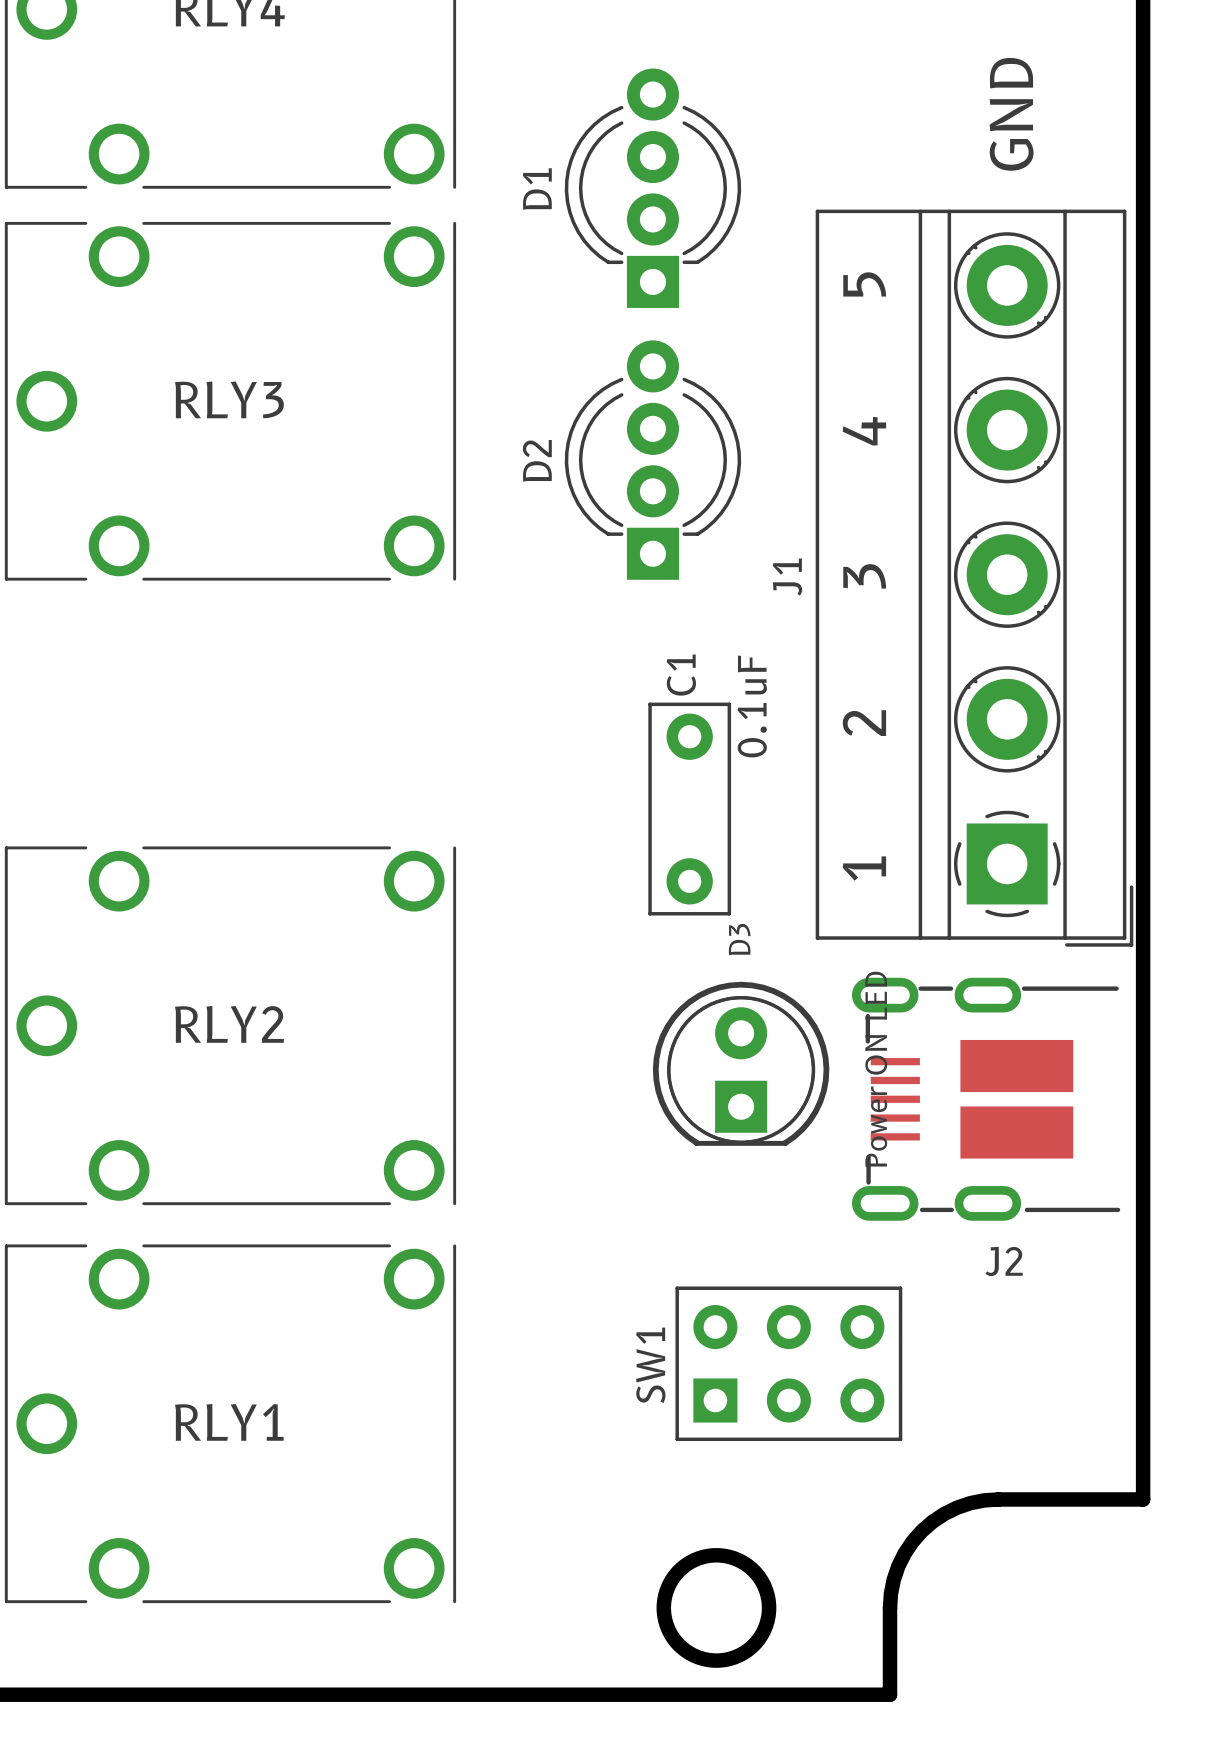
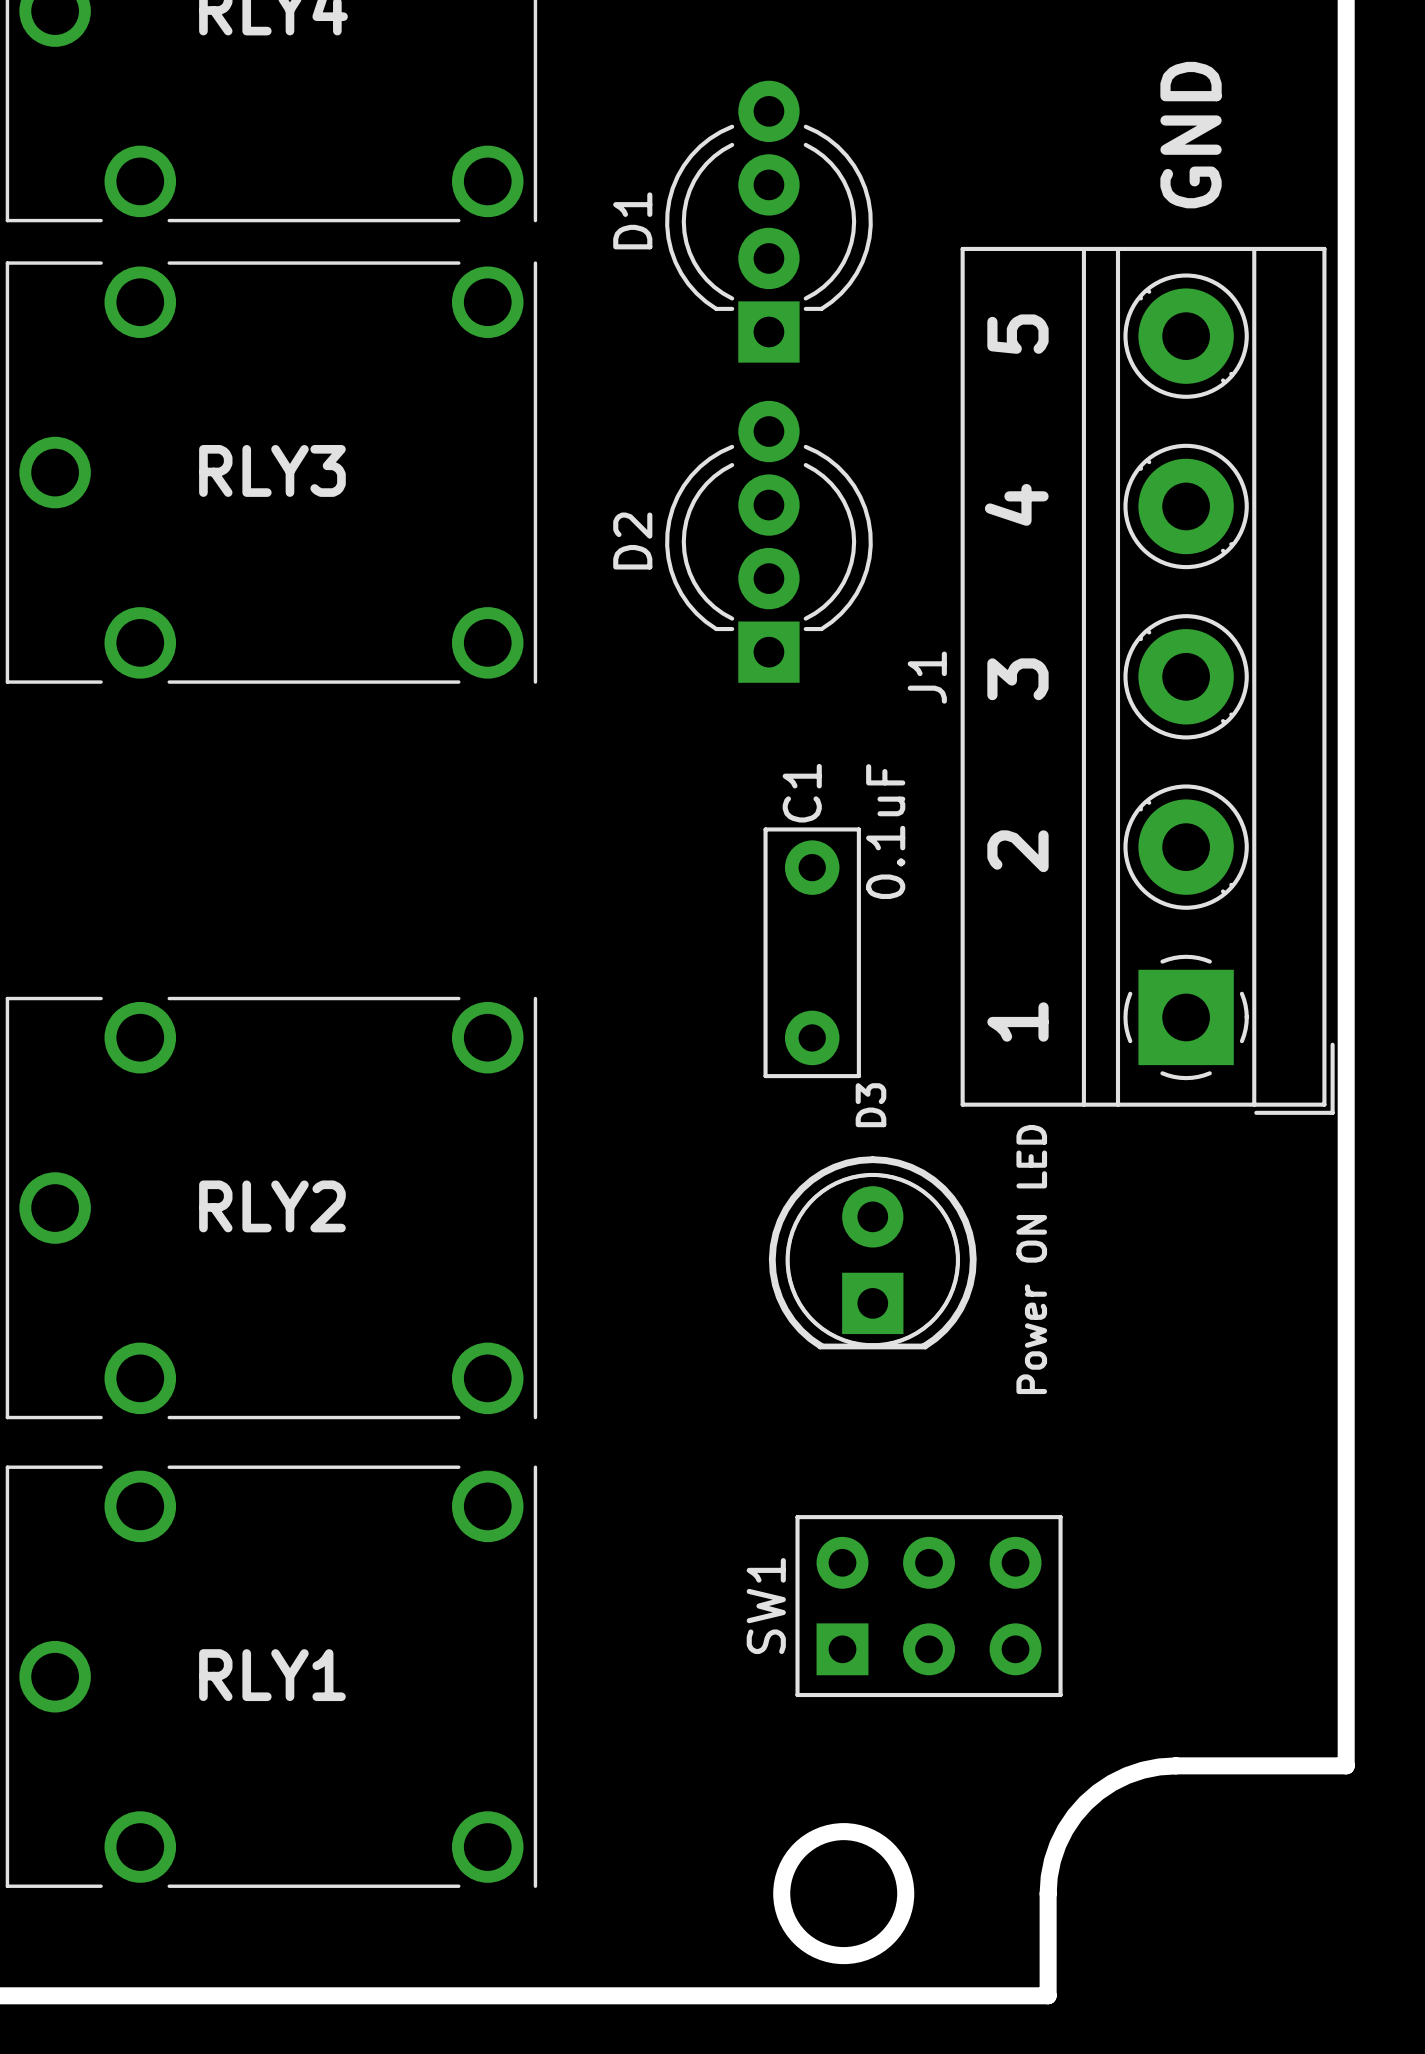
J2: (986, 1099) -> none

